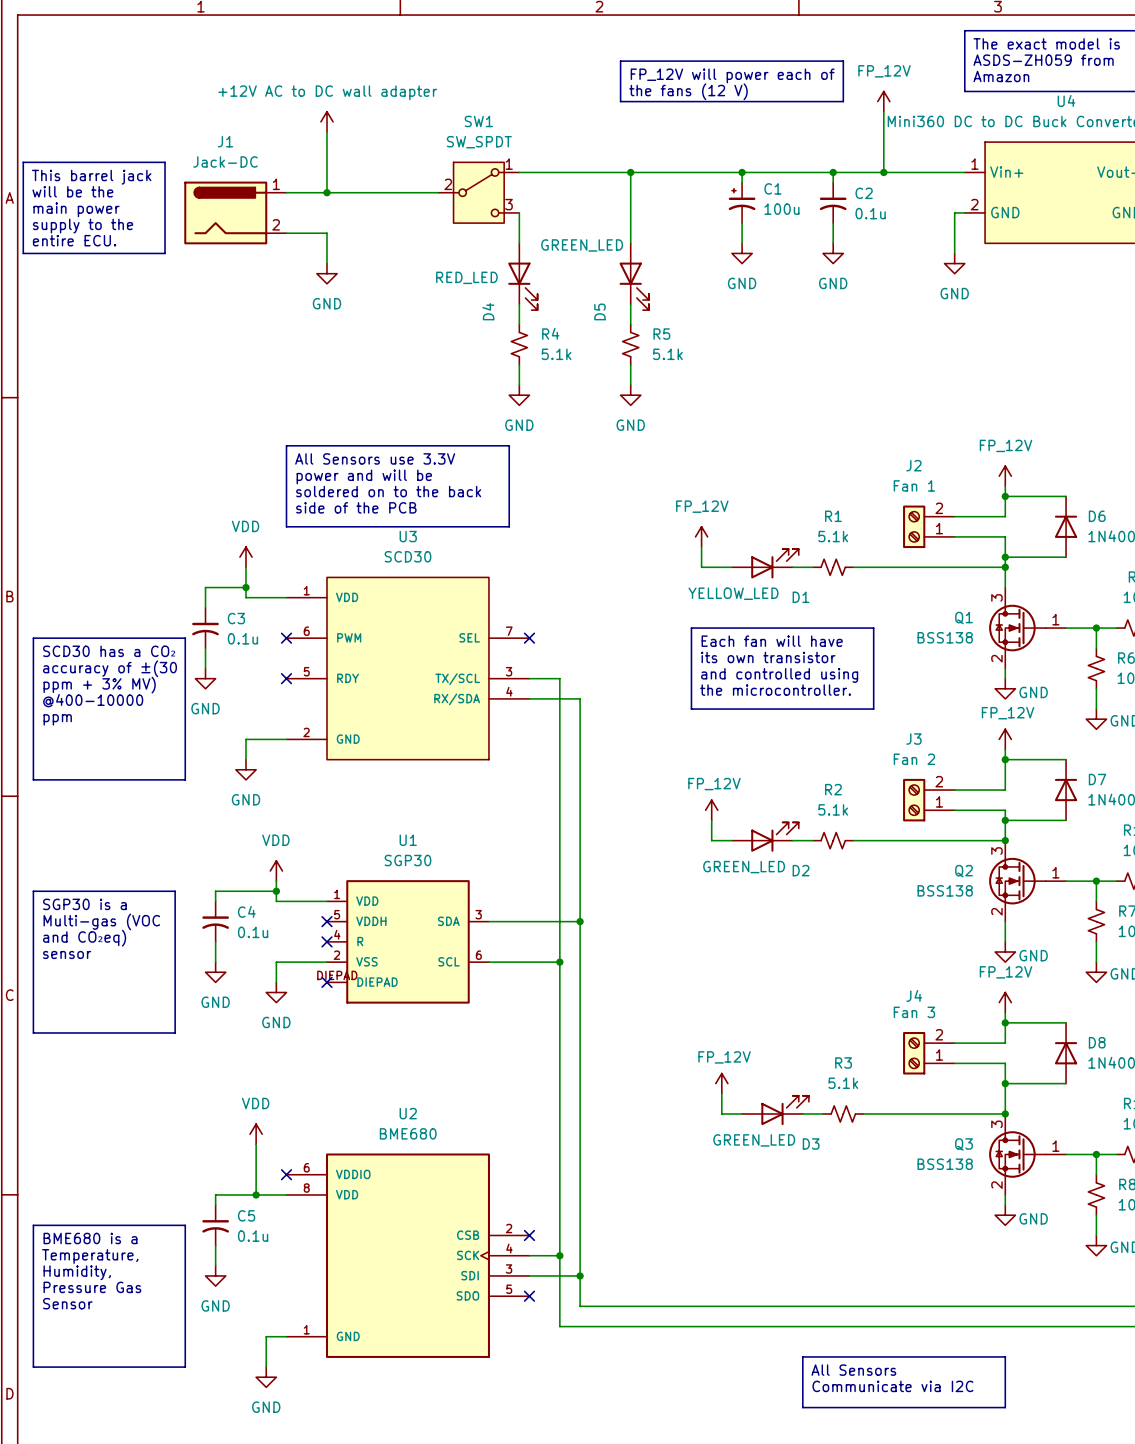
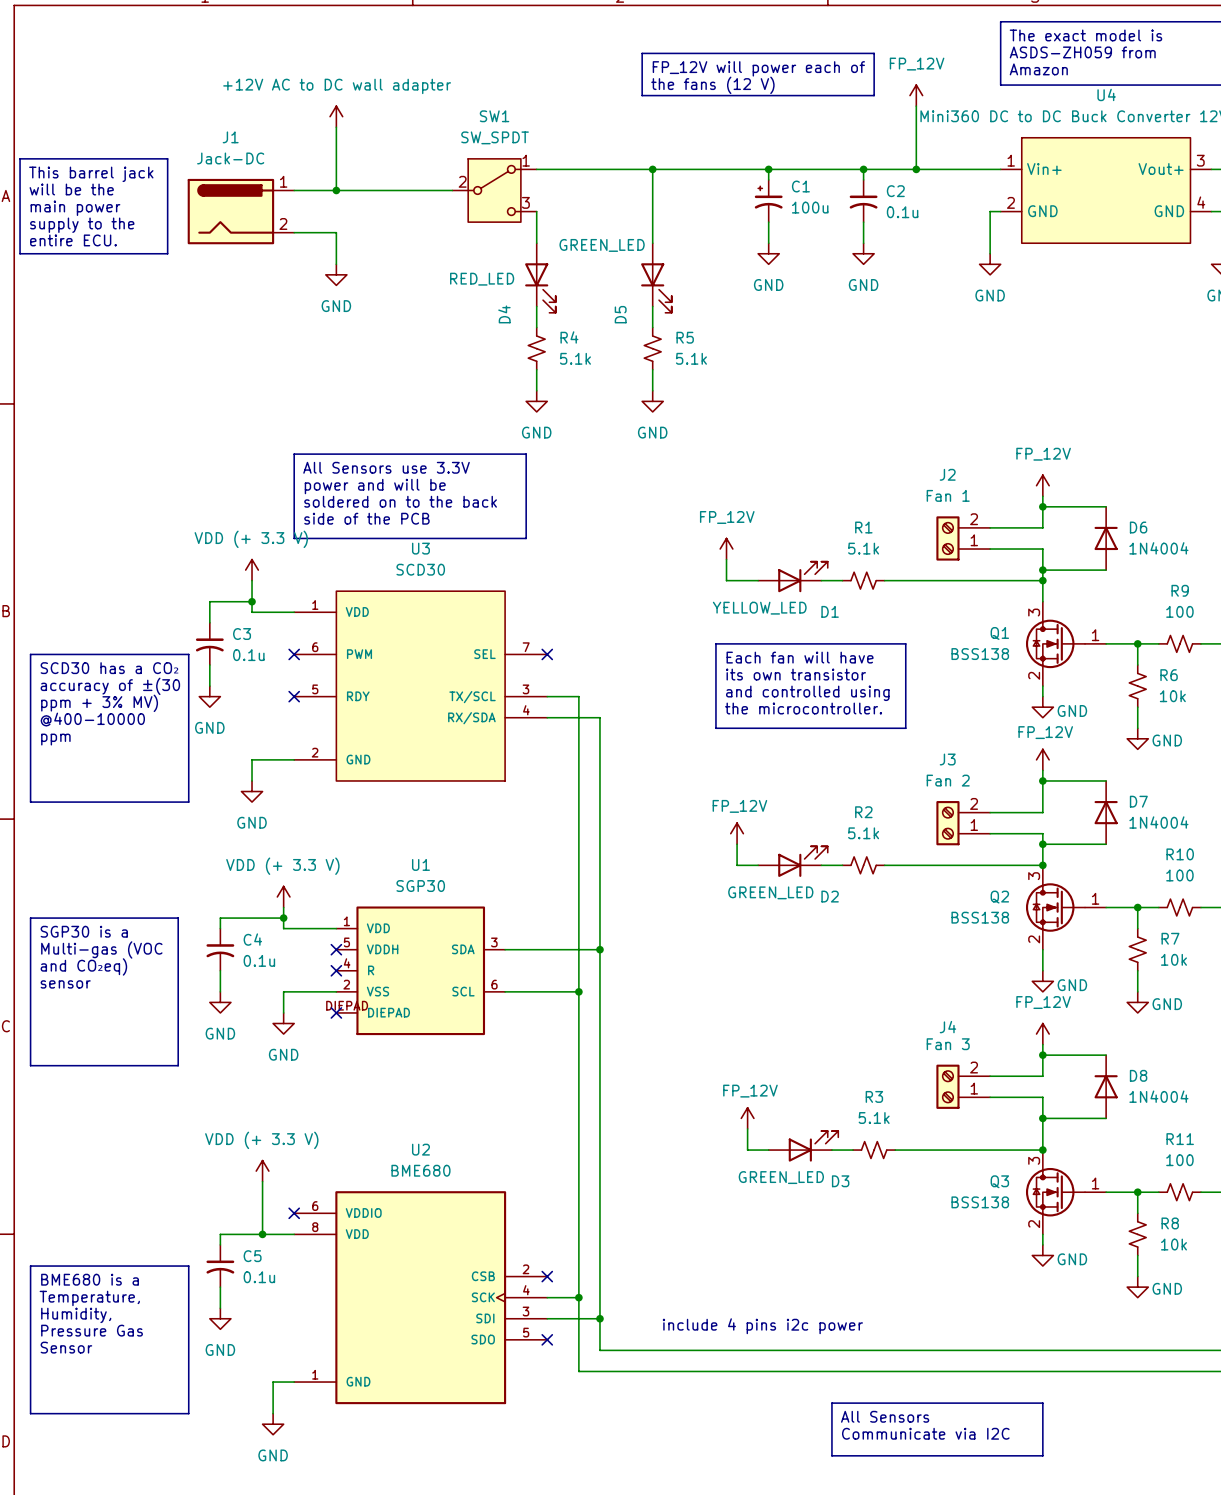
power symbol: VDD (246, 557) -> VDD (+ 3.3 V) (252, 570)
power symbol: VDD (276, 871) -> VDD (+ 3.3 V) (283, 896)
power symbol: VDD (256, 1134) -> VDD (+ 3.3 V) (262, 1171)
text: none -> include 4 pins i2c power (762, 1326)

